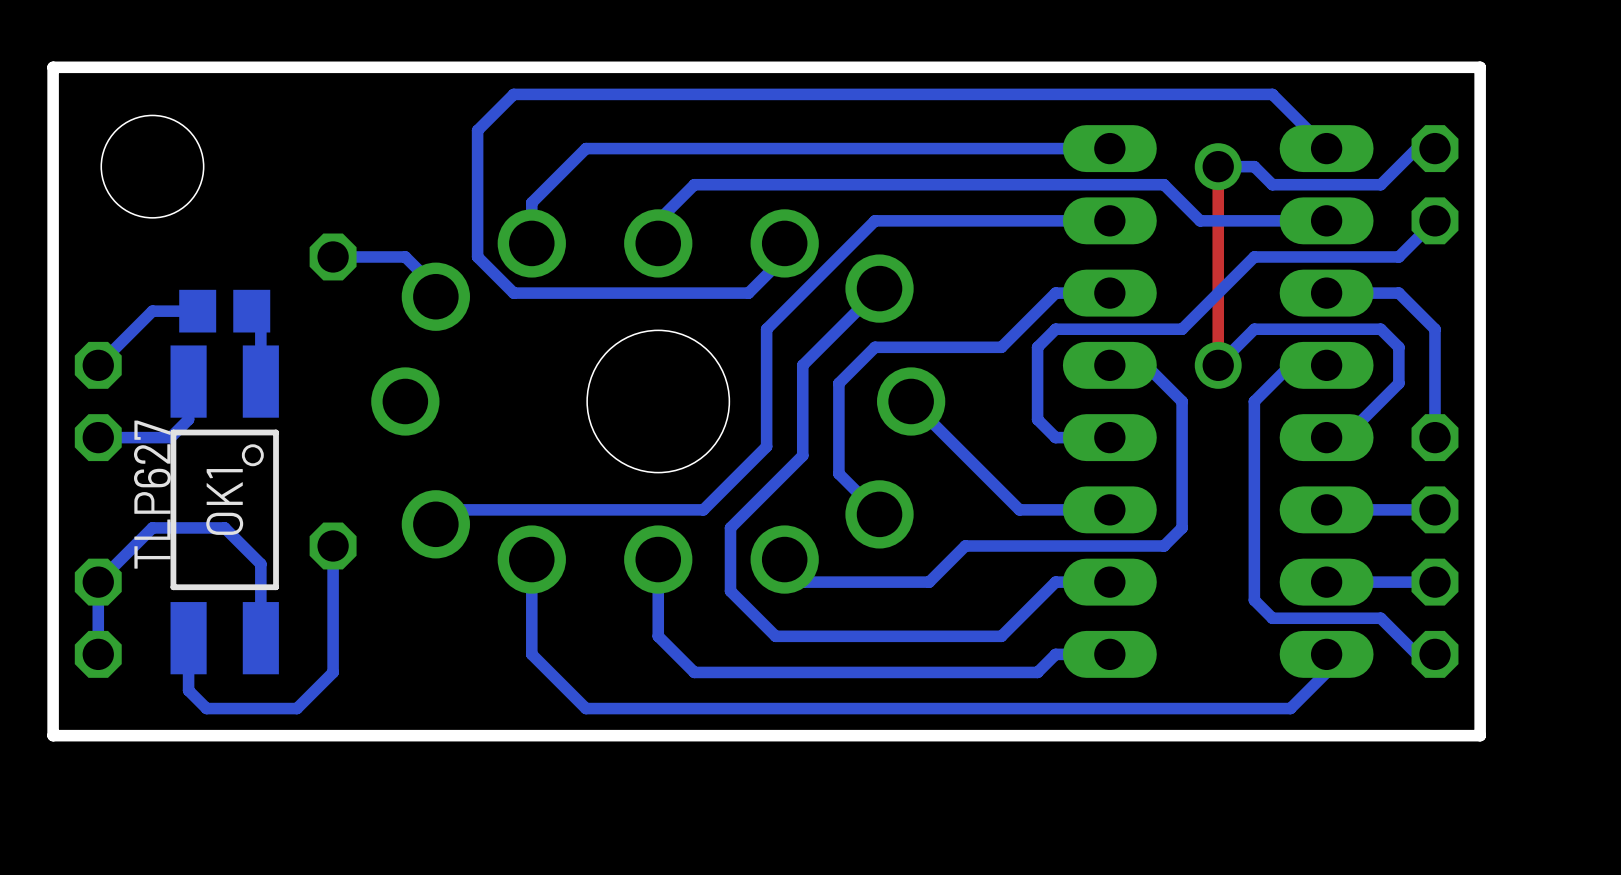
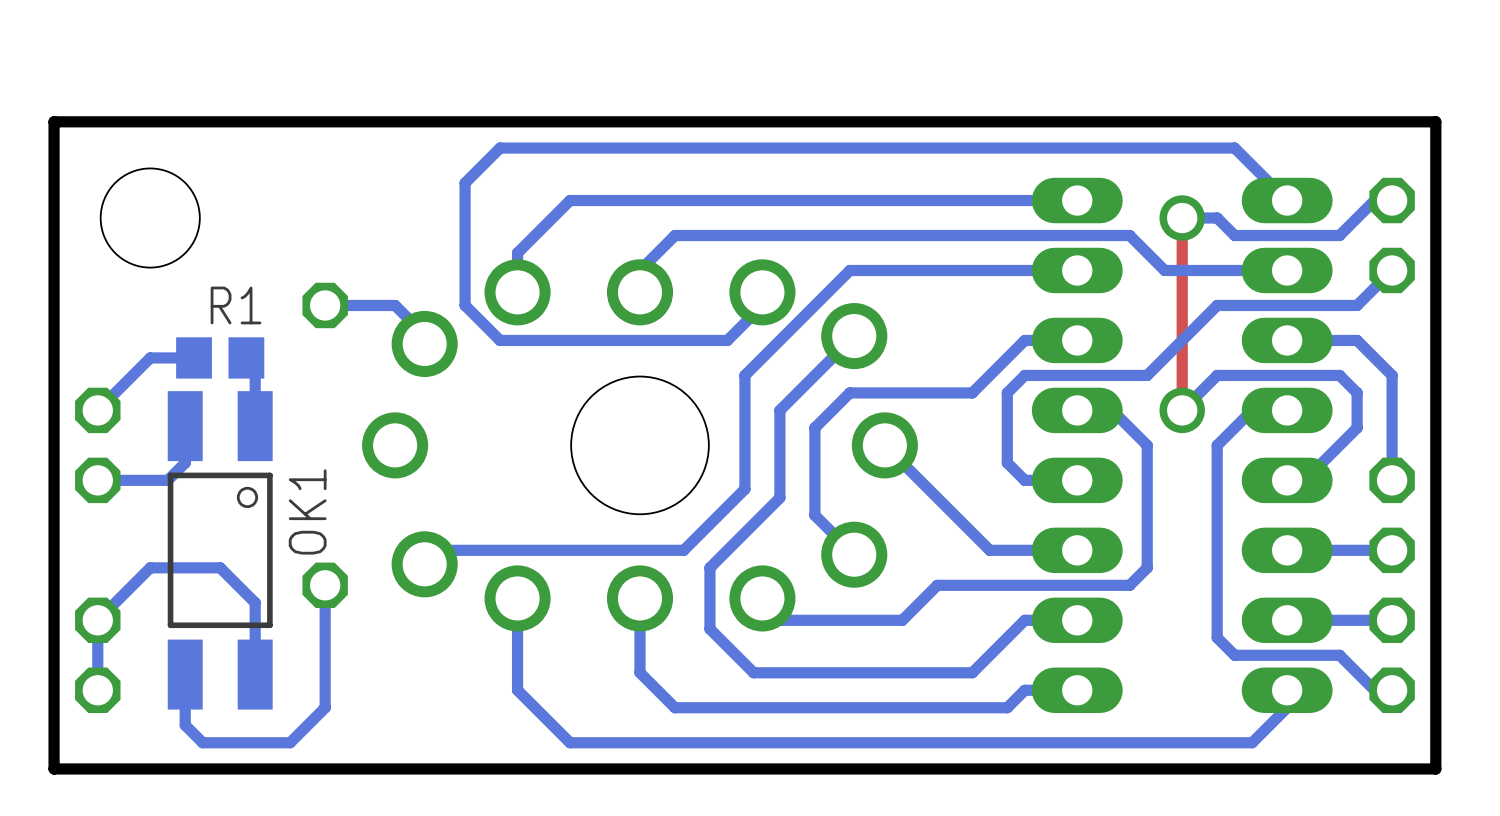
R1 name: none -> R1 (236, 305)
OK1 value: TLP627 (152, 494) -> none
OK1 name position: OK1 (224, 501) -> OK1 (307, 511)

